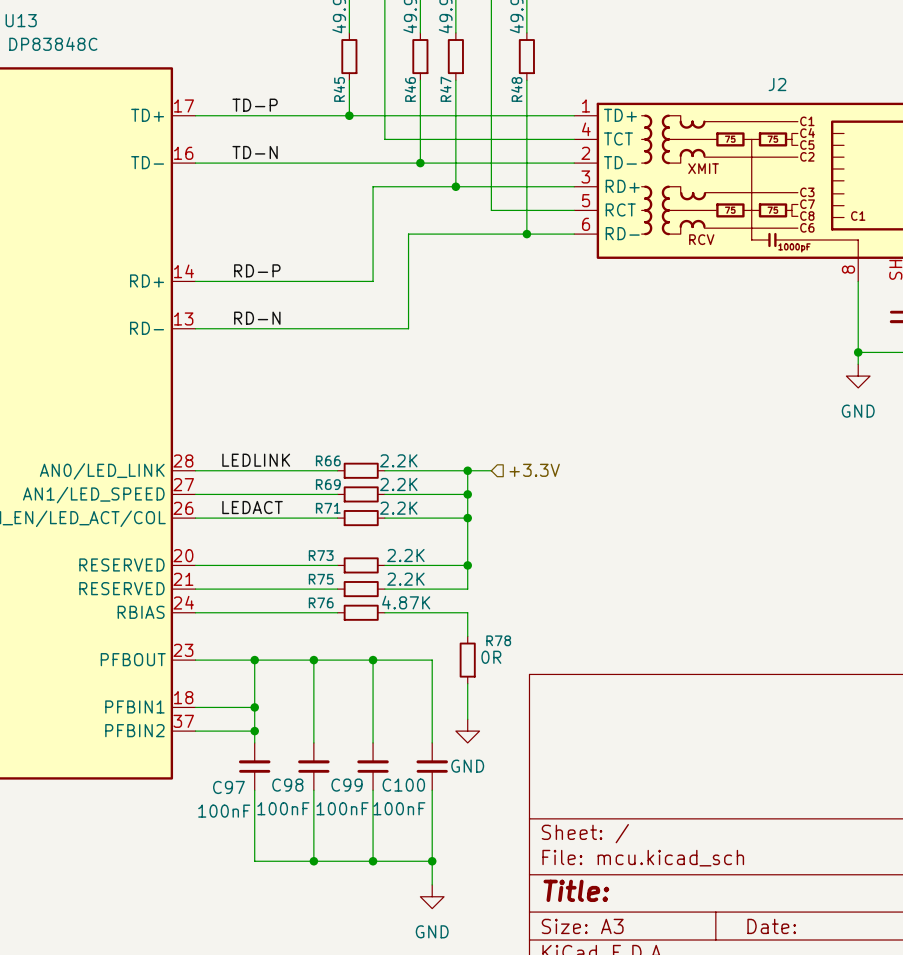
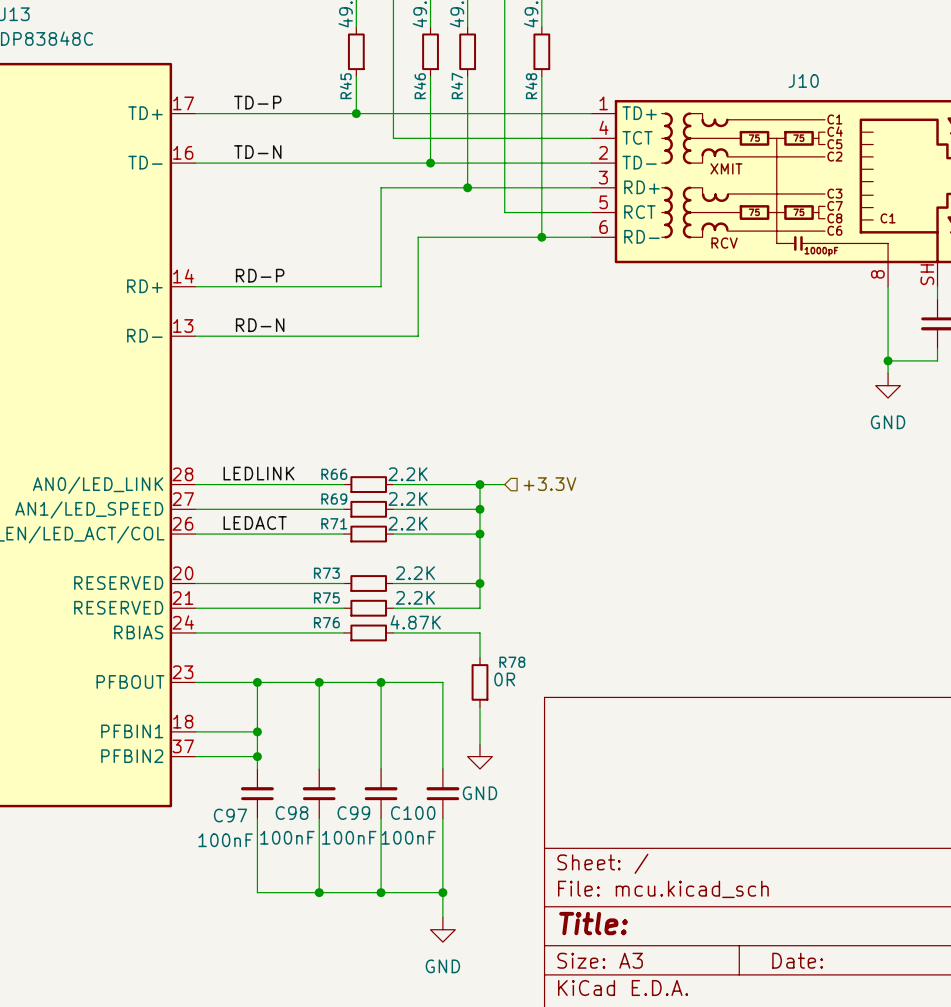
J2 name: J2 (777, 84) -> J10 (803, 81)

